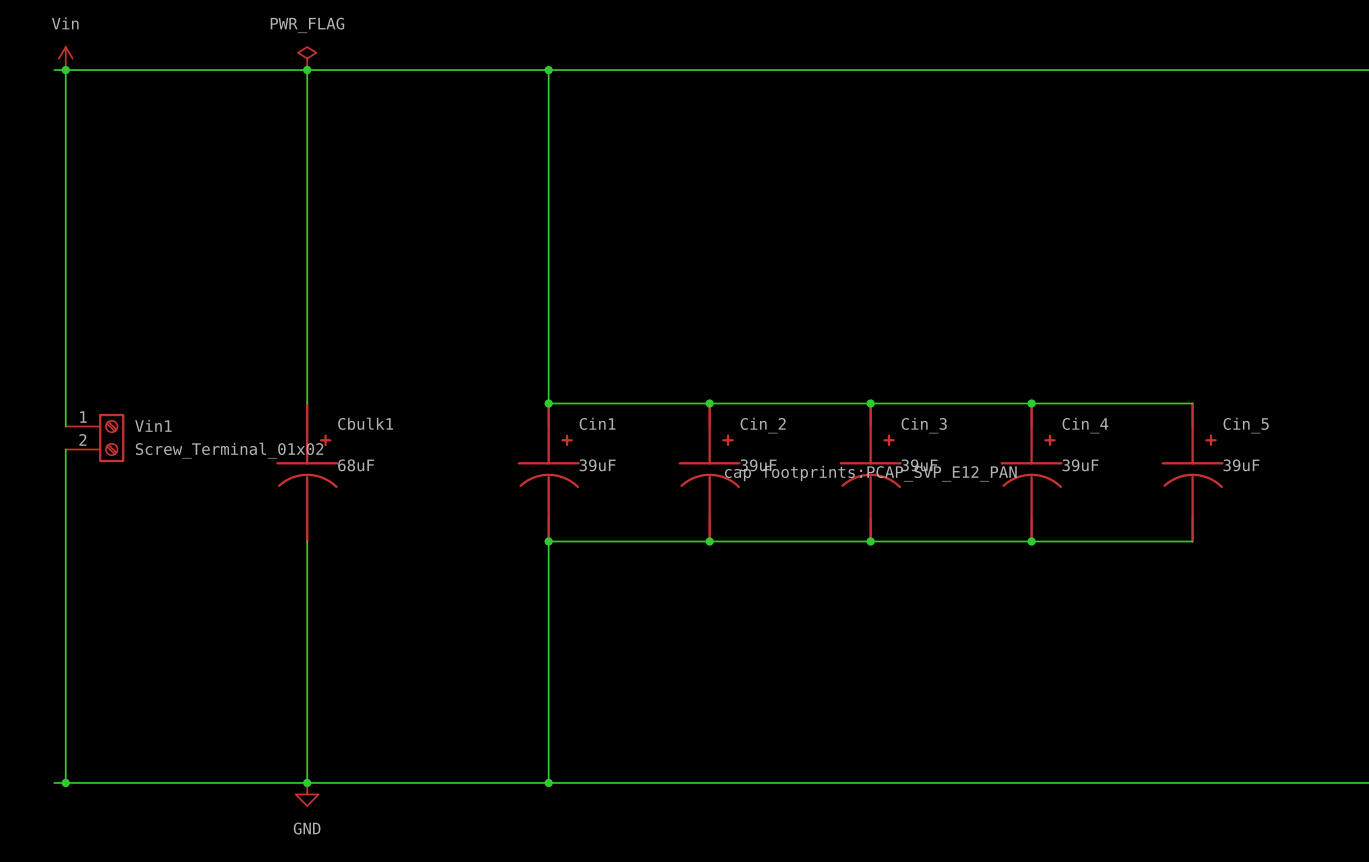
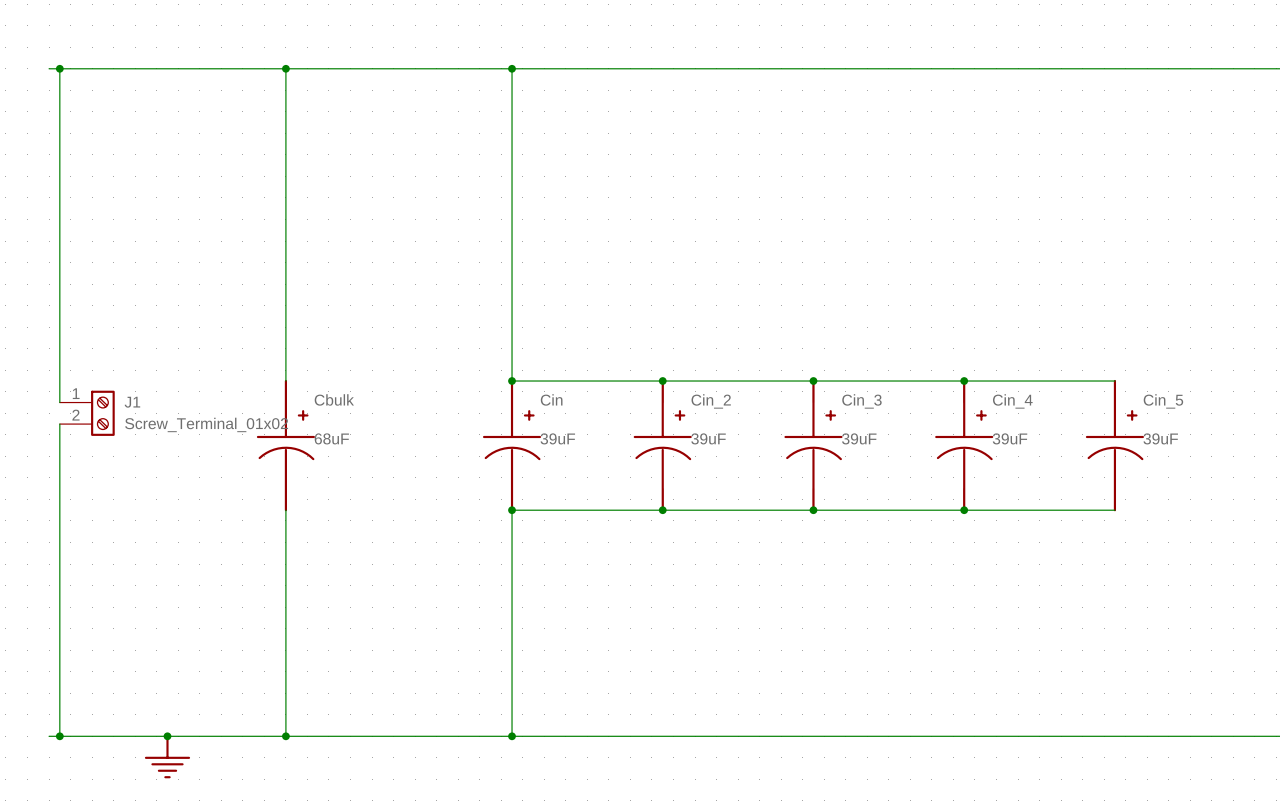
power symbol: Vin (65, 58) -> none
power symbol: PWR_FLAG (307, 58) -> none
Cbulk1 name: Cbulk1 (365, 423) -> Cbulk (334, 399)
Cin1 name: Cin1 (597, 423) -> Cin (551, 399)
Vin1 name: Vin1 (153, 425) -> J1 (132, 402)
Cin_3 text: cap footprints:PCAP_SVP_E12_PAN (870, 473) -> none
junction: none -> (167, 736)
power symbol: GND (307, 794) -> none
power symbol: none -> (167, 756)

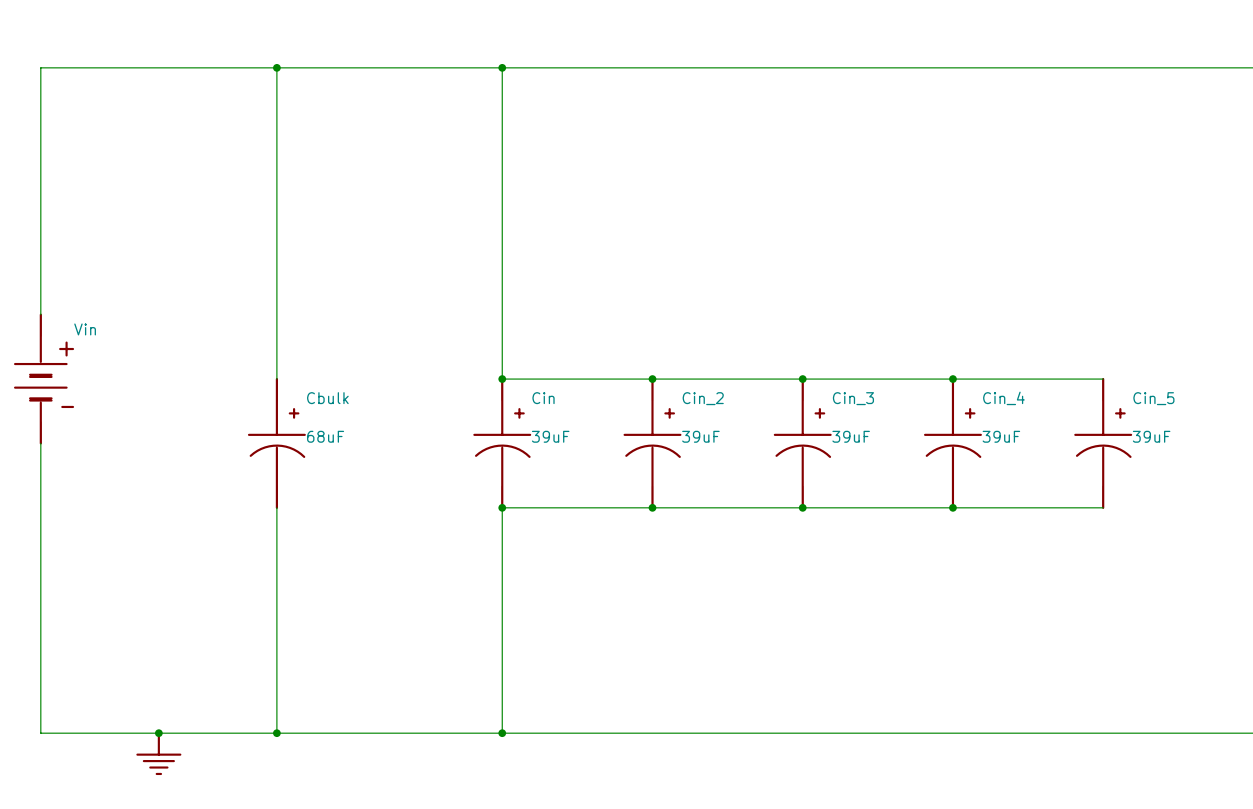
wire: none -> (40, 67) (40, 314)
wire: (59, 68) (59, 402) -> none
junction: (59, 68) -> none
Vin: none -> (44, 379)
J1: Screw_Terminal_01x02 (87, 413) -> none
wire: (59, 424) (59, 736) -> none
wire: none -> (40, 443) (40, 733)
junction: (59, 736) -> none

